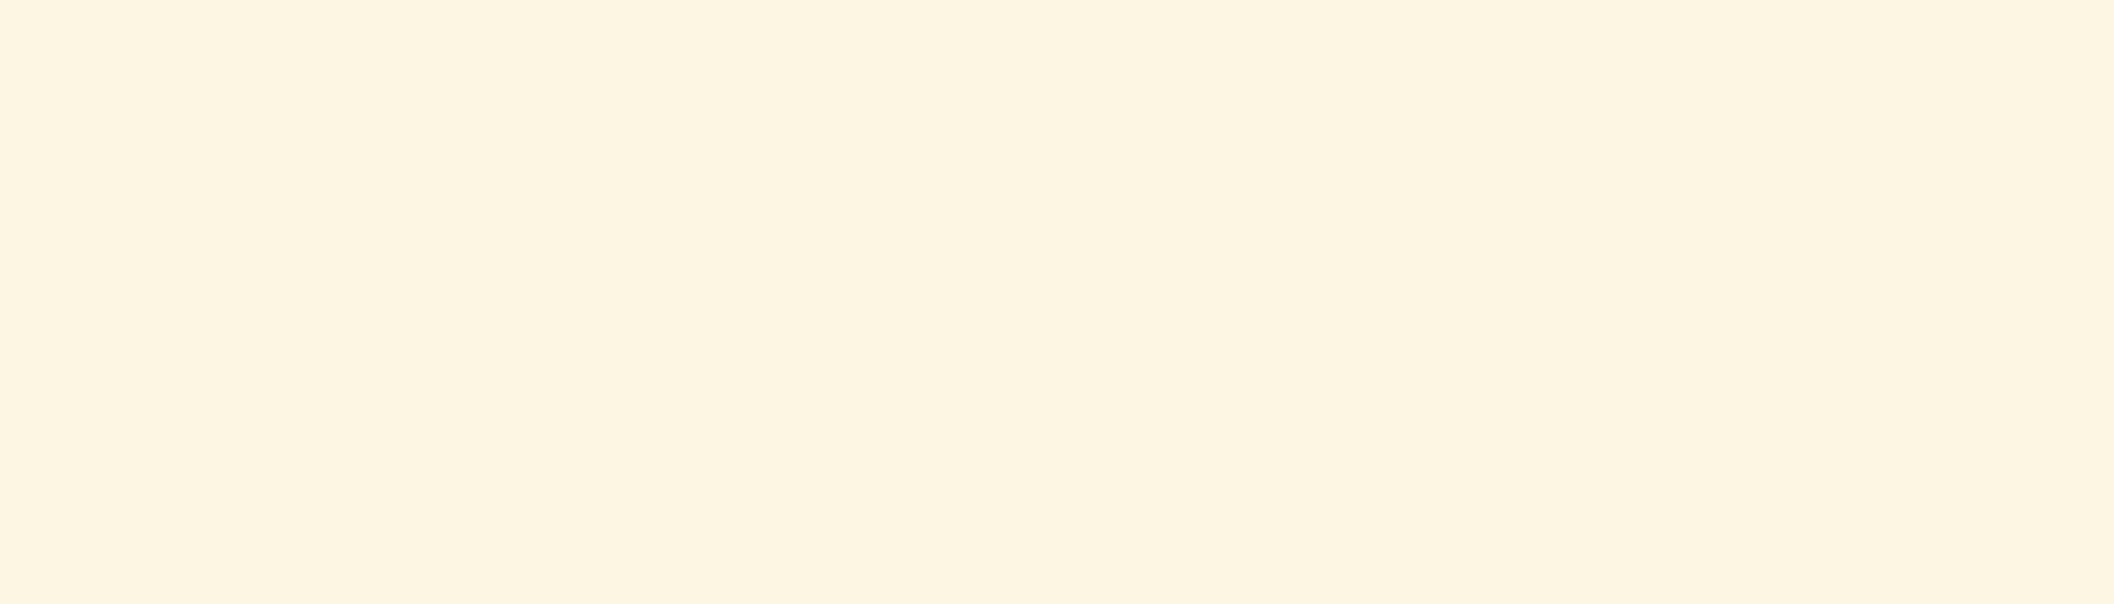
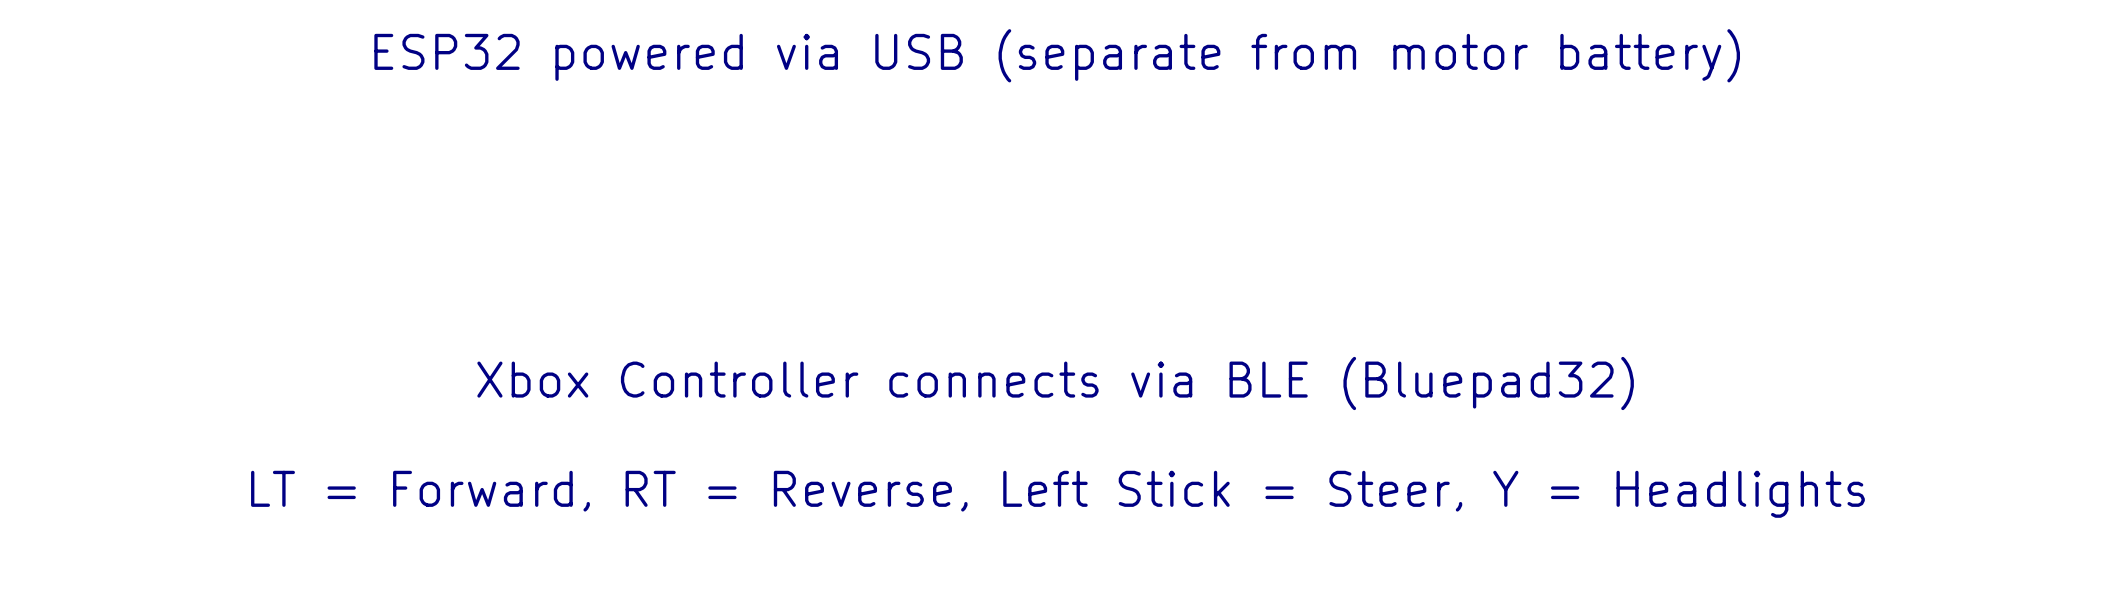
text: none -> ESP32 powered via USB (separate from motor battery) (1057, 55)
text: none -> Xbox Controller connects via BLE (Bluepad32) (1055, 383)
text: none -> LT = Forward, RT = Reverse, Left Stick = Steer, Y = Headlights (1057, 494)

